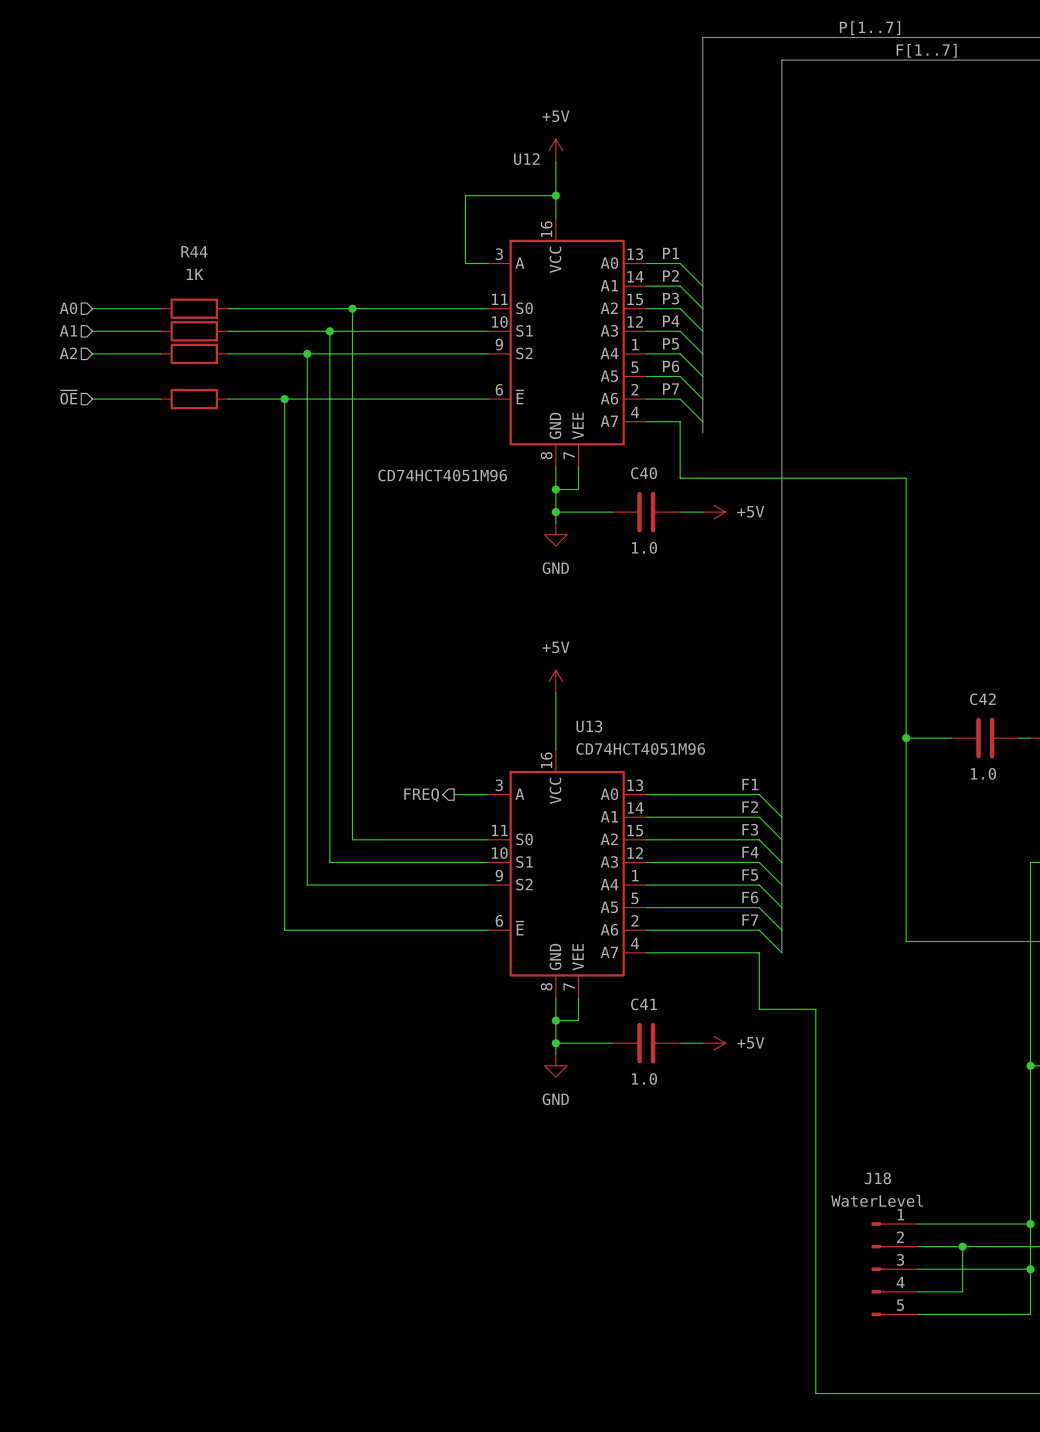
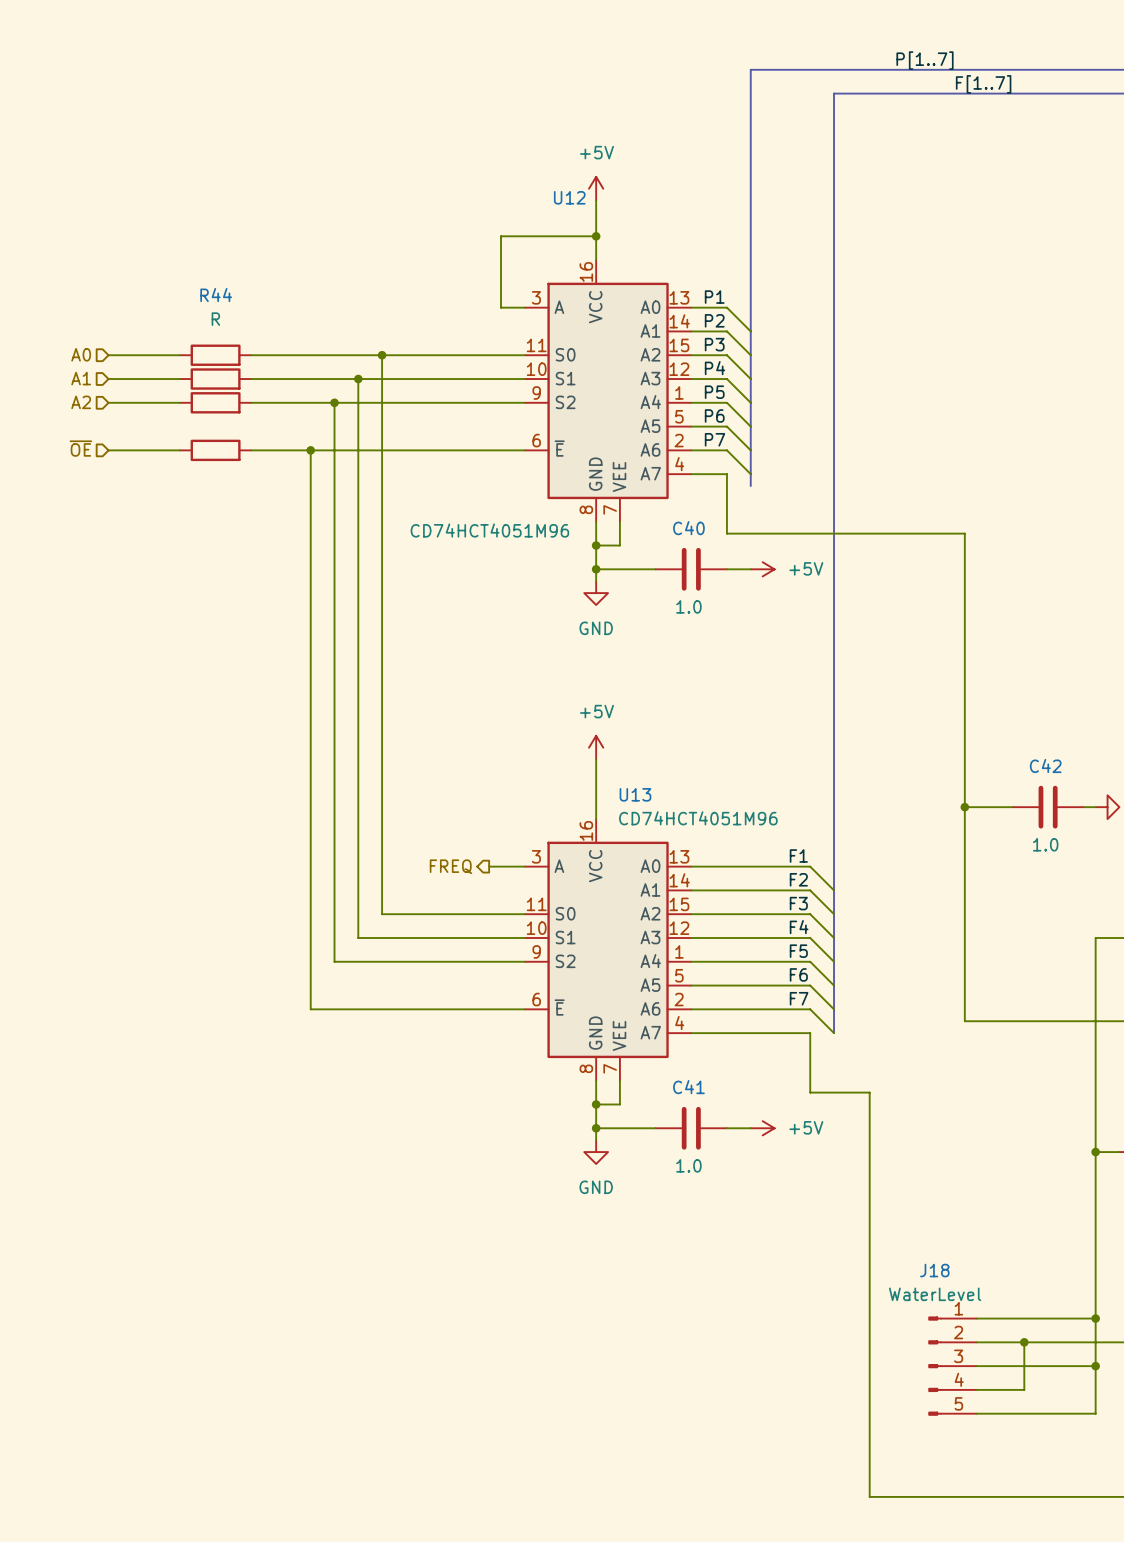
R44 value: 1K (195, 274) -> R (215, 319)

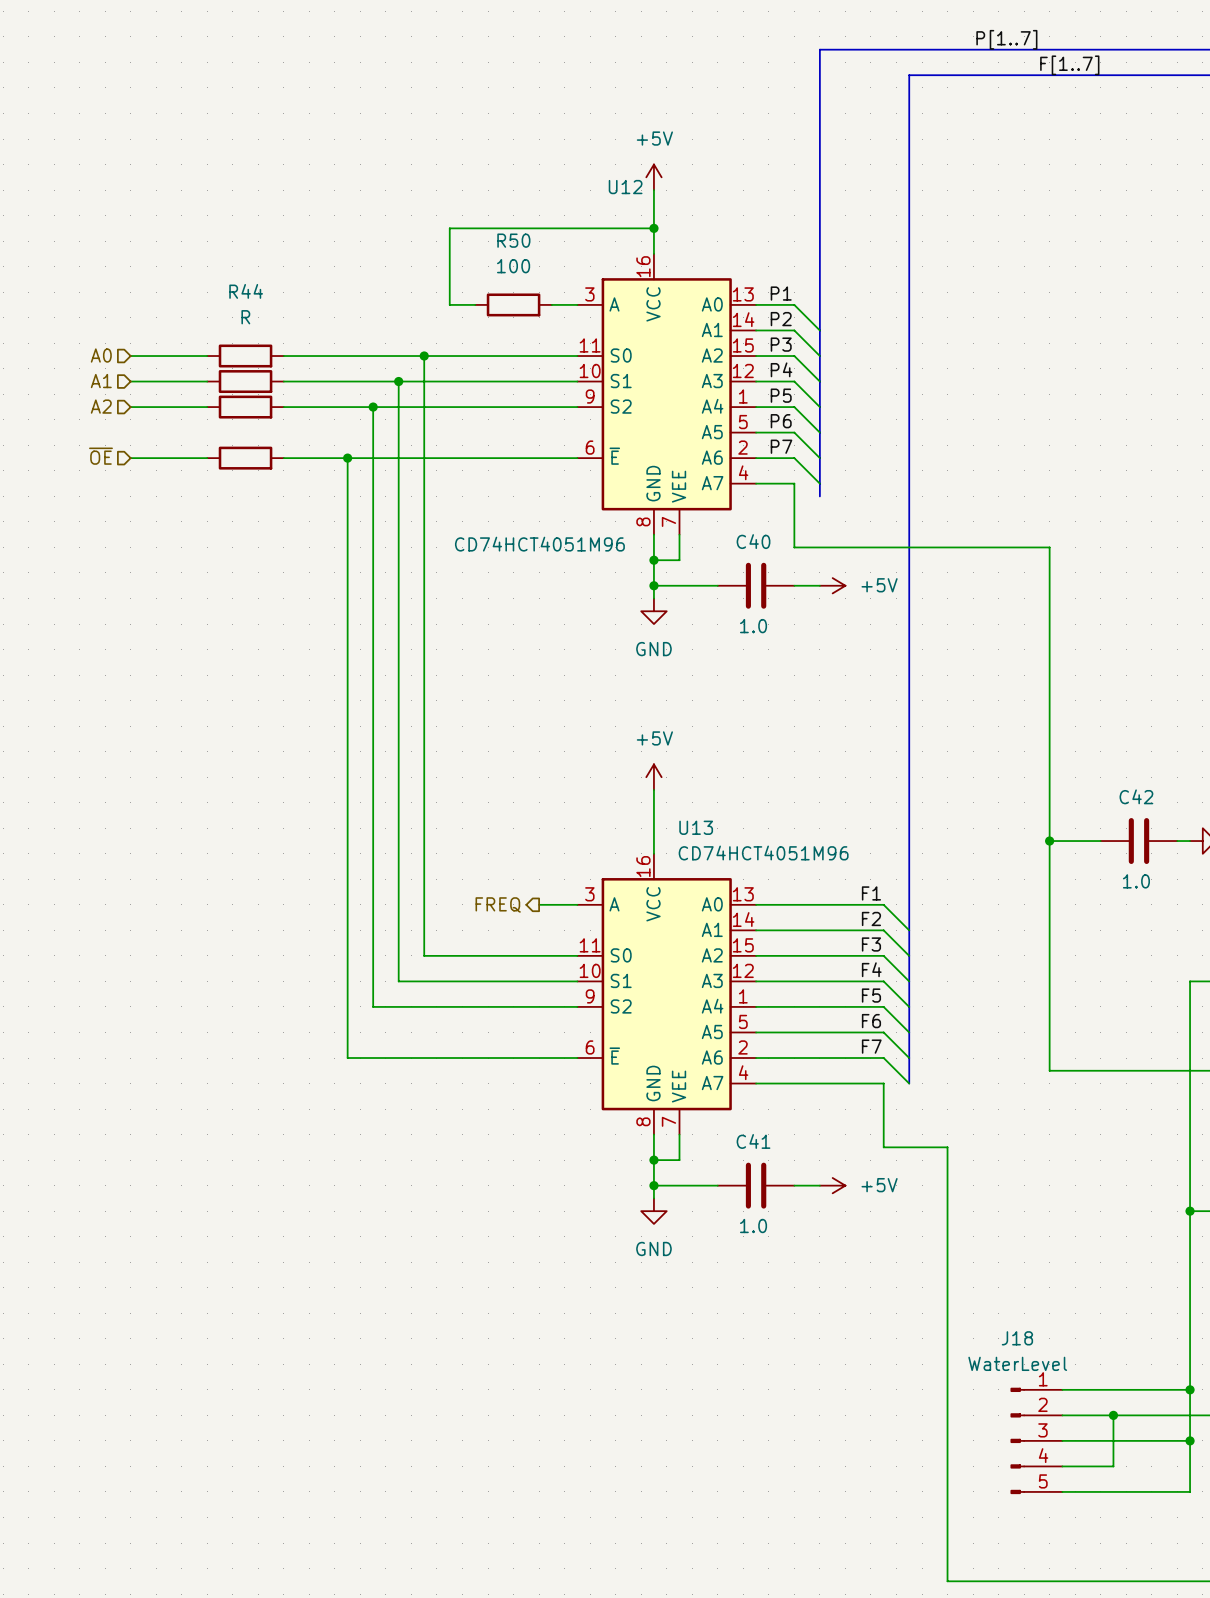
wire: (501, 236) (501, 307) -> (551, 228) (449, 228) (449, 304) (475, 304)
R50: none -> 100 (513, 304)

